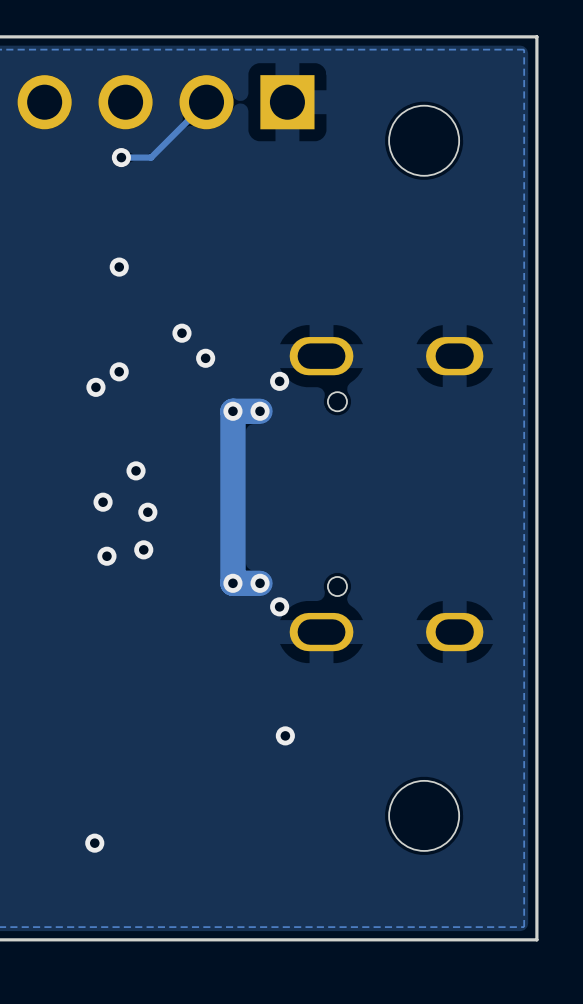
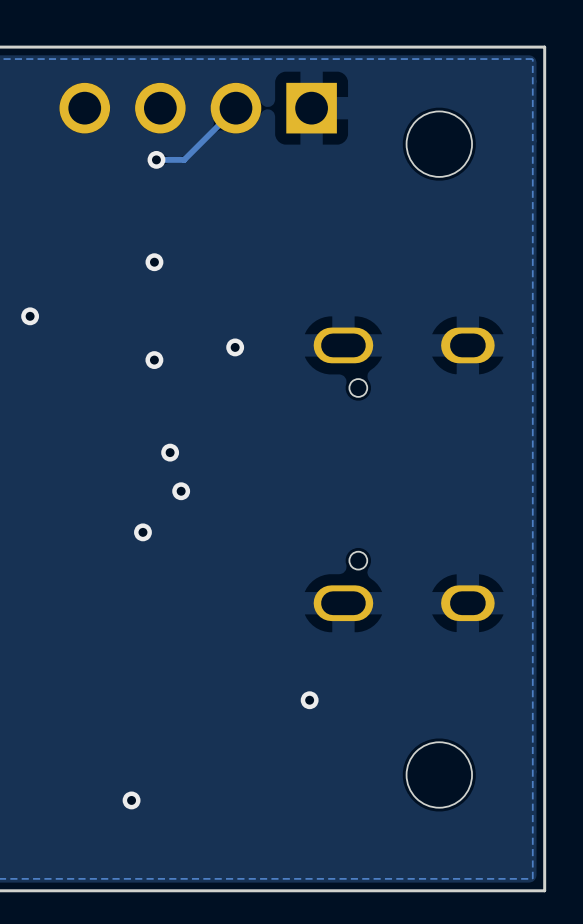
via: (181, 333) -> none
via: (279, 381) -> none
via: (95, 387) -> none
via: (232, 411) -> none
track: (260, 411) (232, 411) (232, 583) (260, 583) -> none
via: (260, 411) -> none
via: (103, 502) -> none
via: (143, 549) -> none
via: (232, 583) -> none
via: (260, 583) -> none
via: (279, 606) -> none

